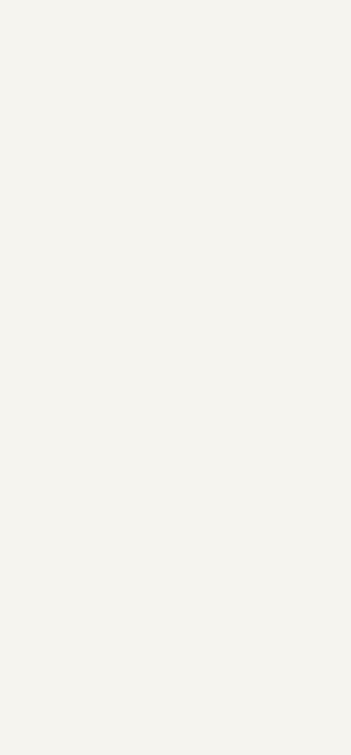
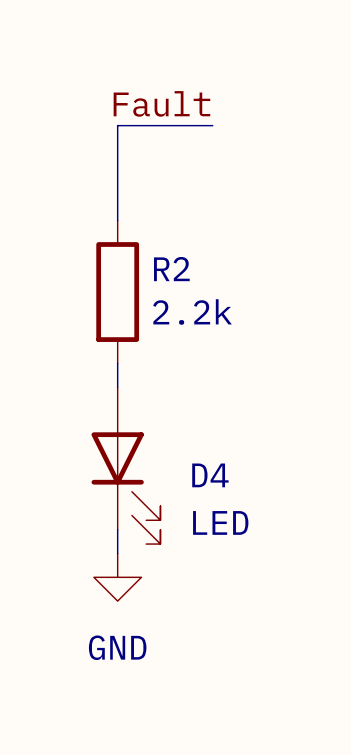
label: none -> Fault (161, 103)
wire: none -> (212, 125) (117, 125) (117, 220)
R2: none -> 2.2k (117, 292)
wire: none -> (117, 363) (117, 387)
D4: none -> LED (125, 465)
wire: none -> (117, 529) (117, 553)
power symbol: none -> GND (117, 577)

